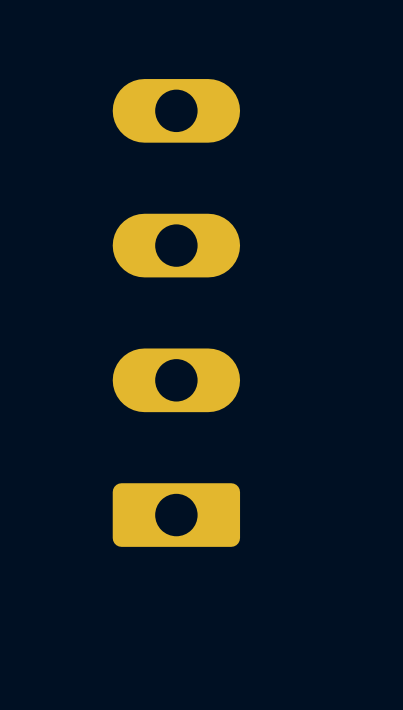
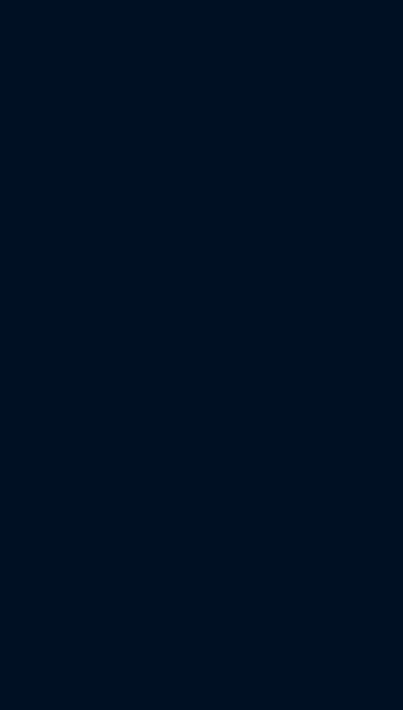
part: (176, 312) -> none

